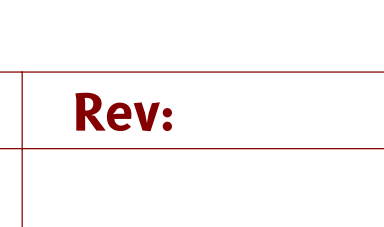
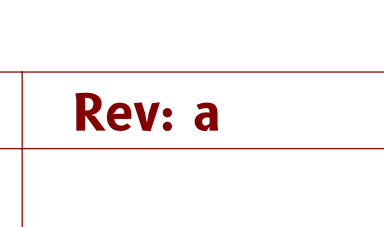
title block: Rev: (123, 111) -> Rev: a (146, 111)

